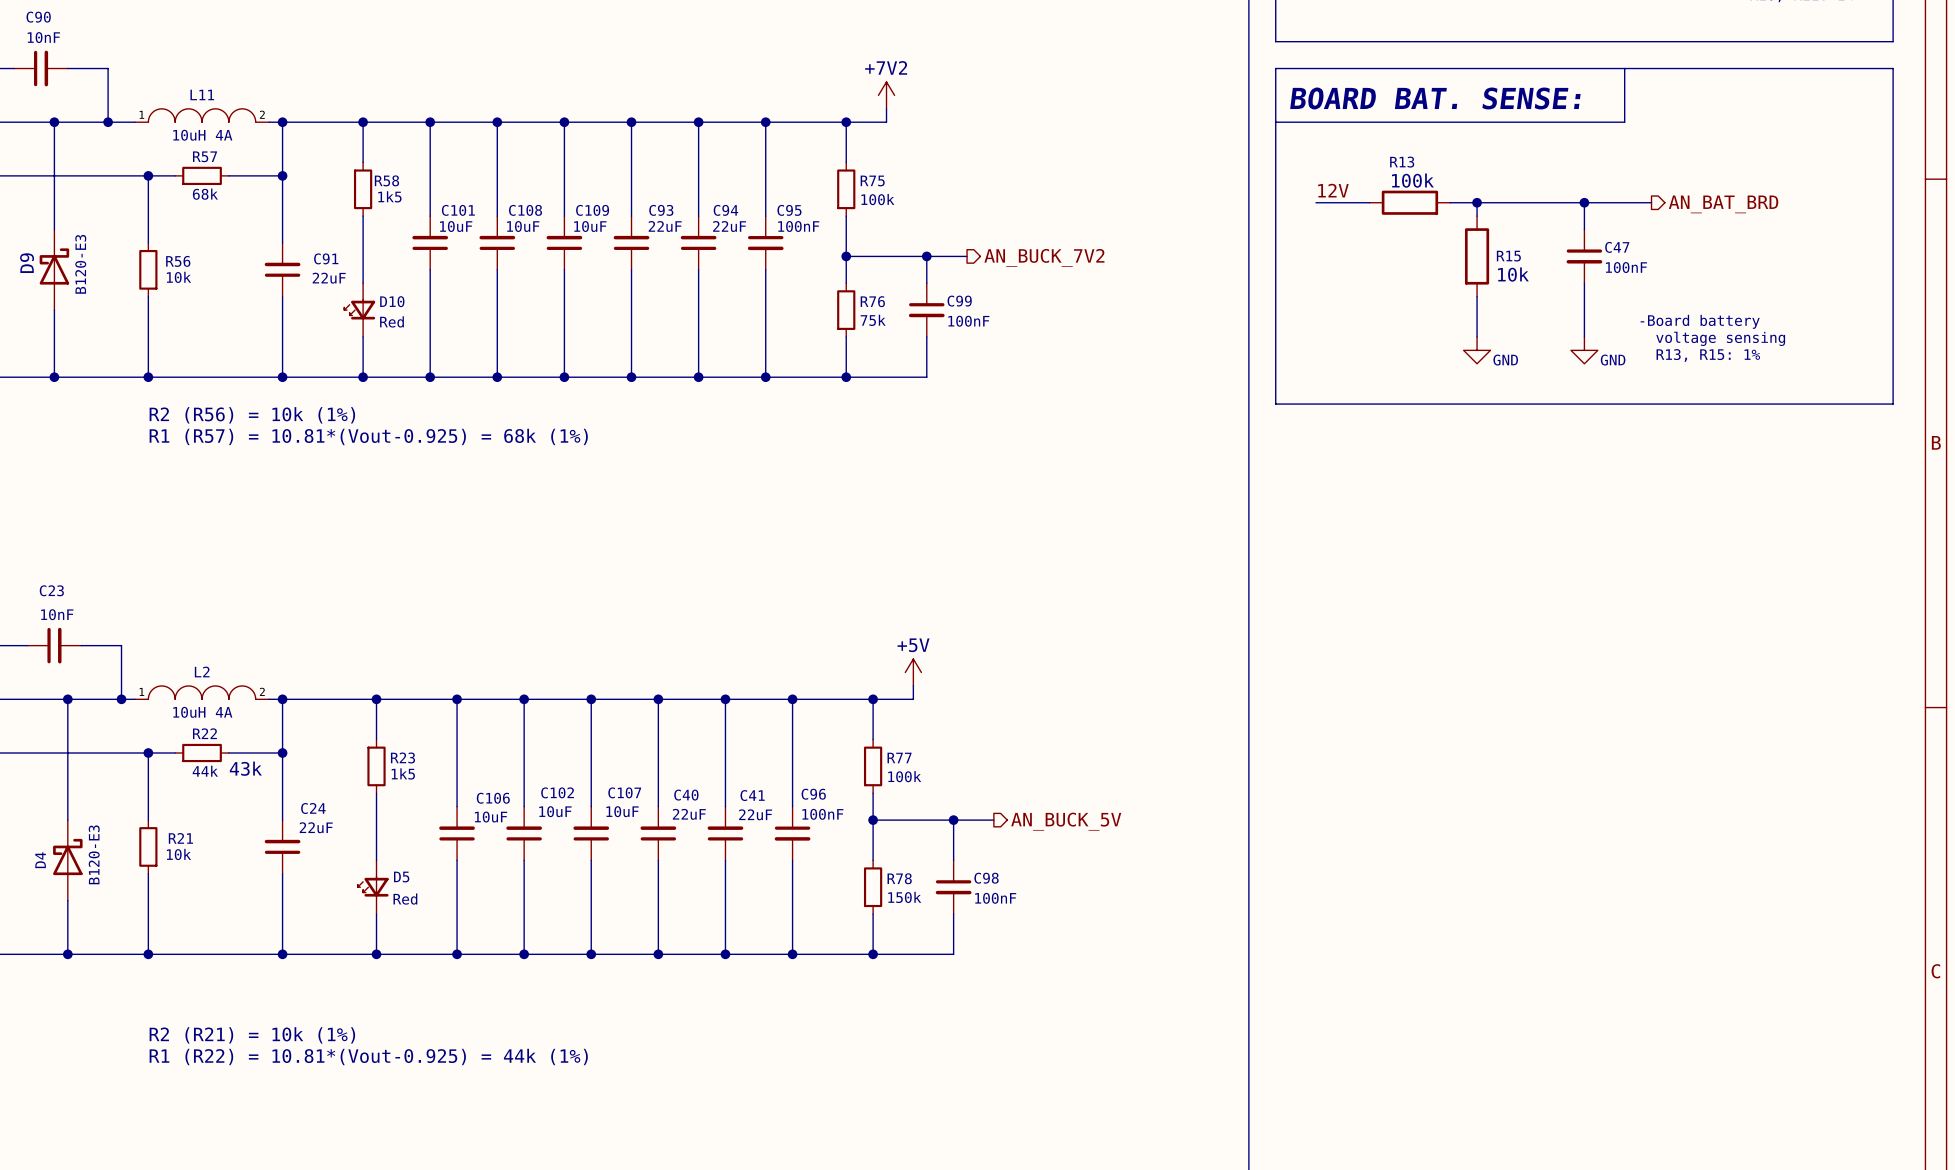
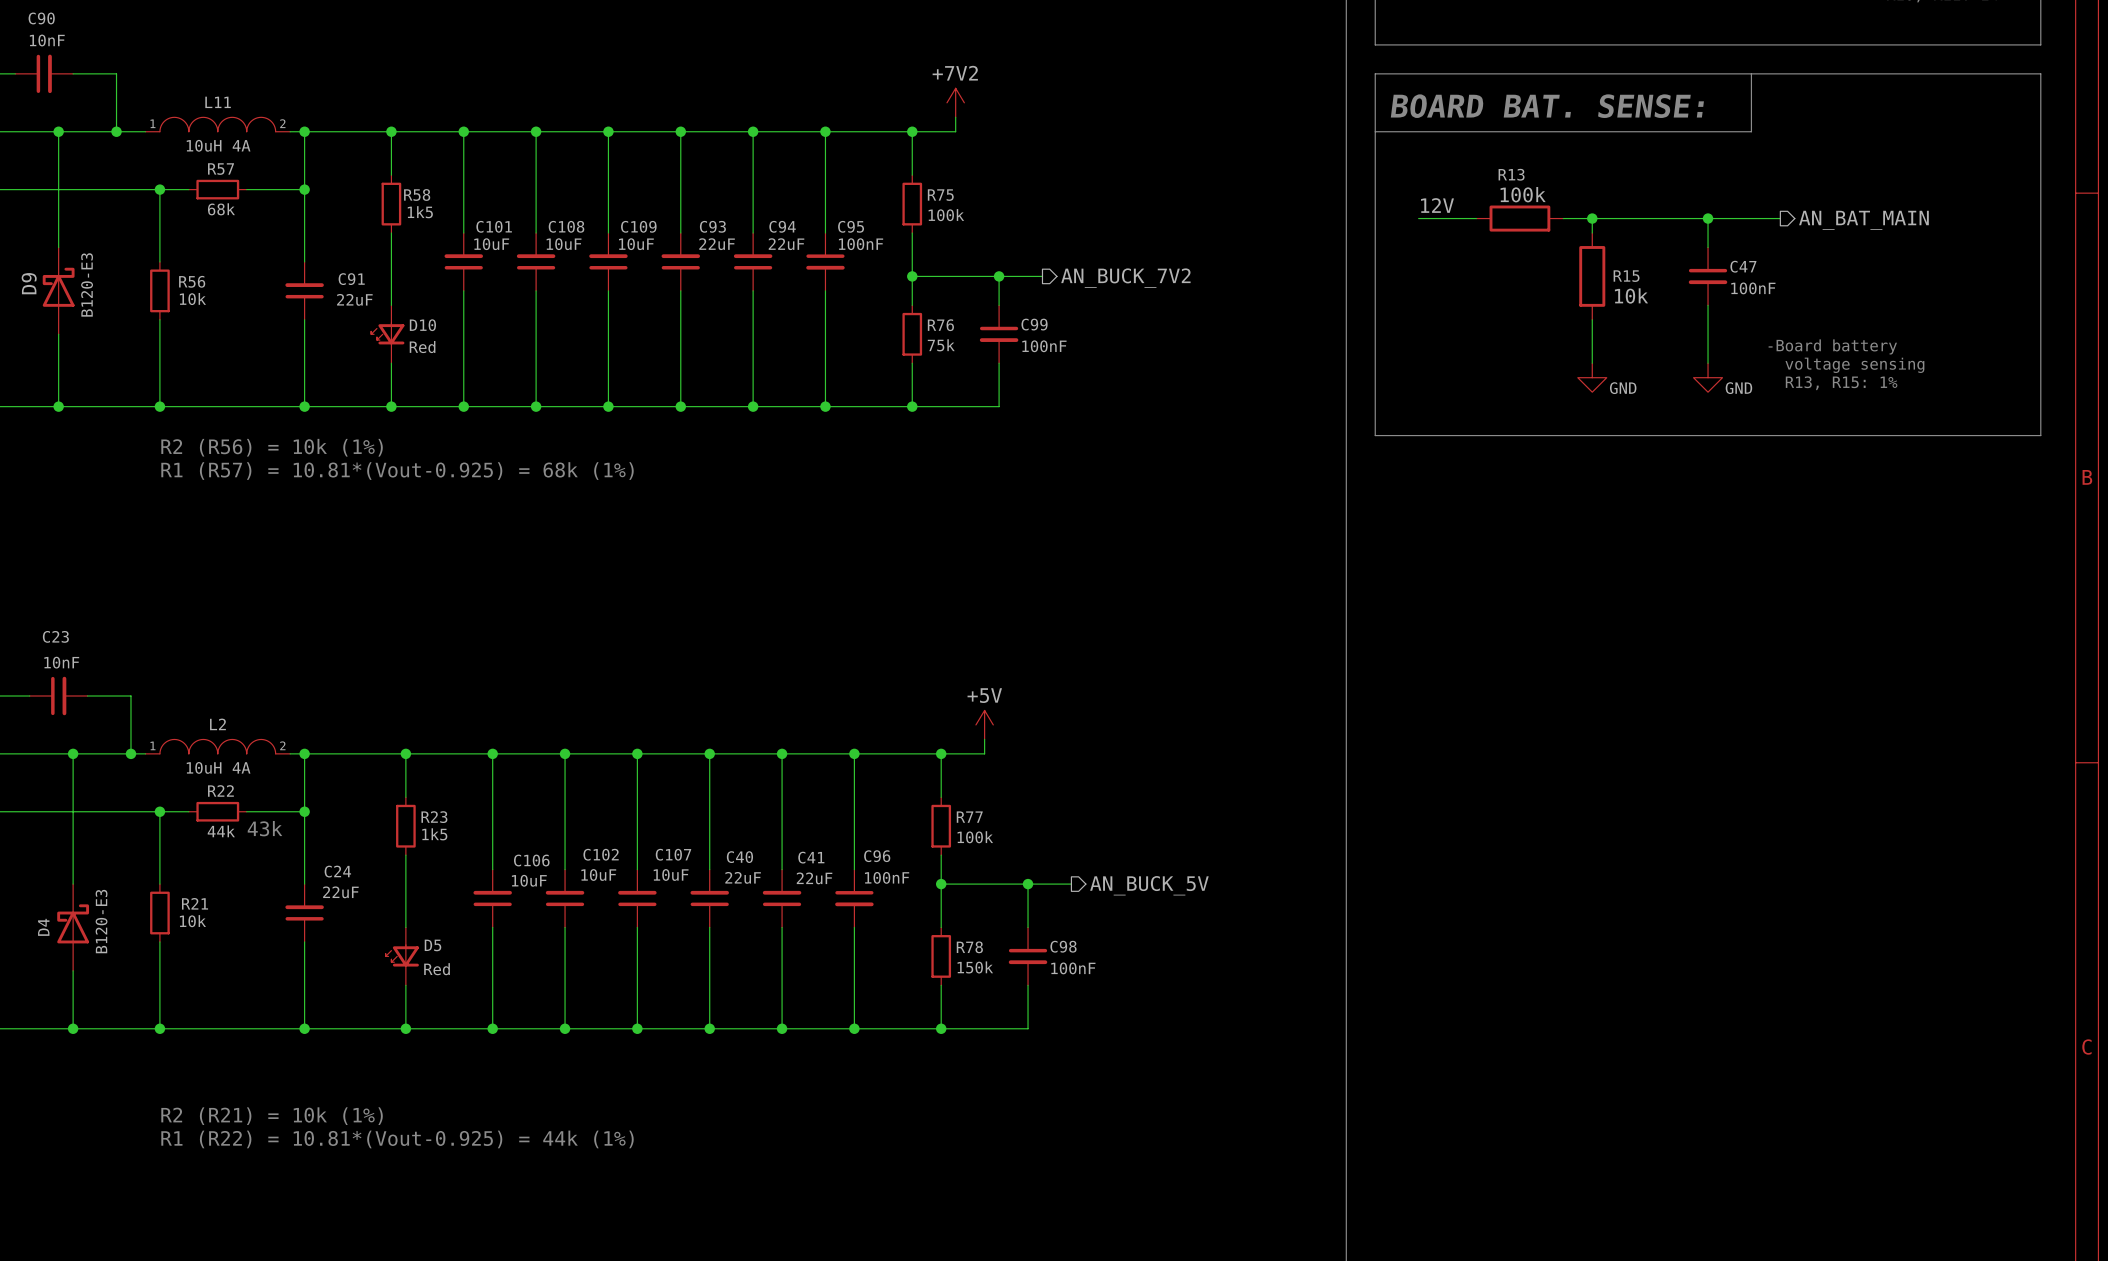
hierarchical label: AN_BAT_BRD (1723, 204) -> AN_BAT_MAIN (1863, 220)

